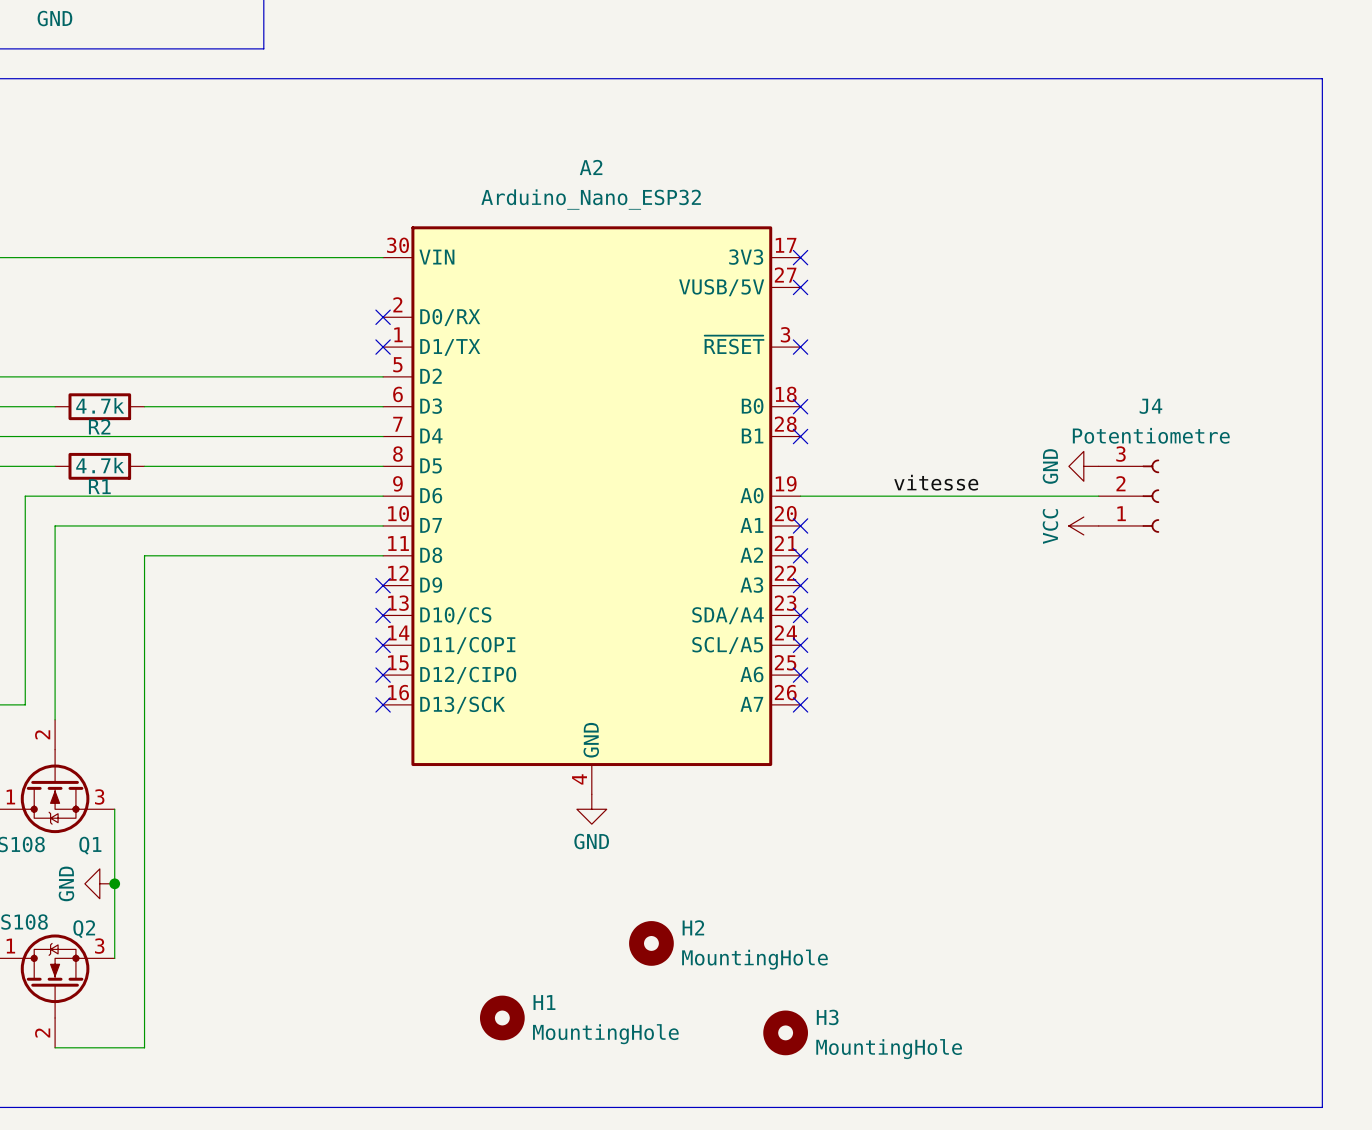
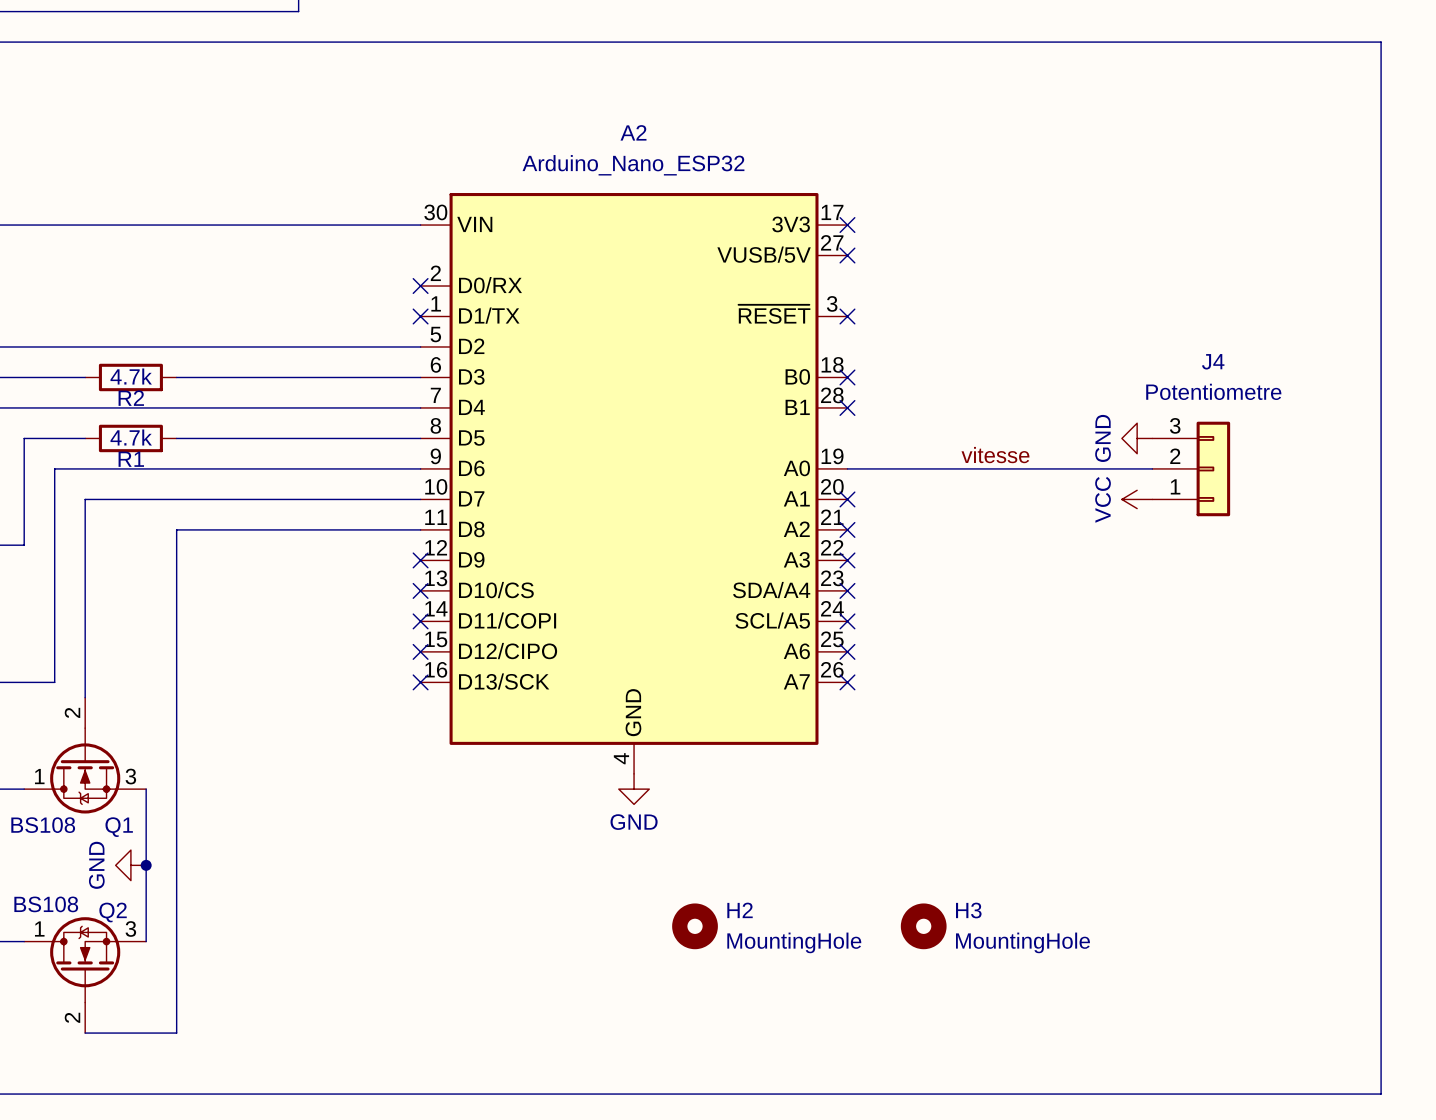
J4 symbol: [1098, 459, 1160, 533] -> [1152, 421, 1231, 517]
H1: MountingHole (502, 1017) -> none
H3 position: (785, 1032) -> (923, 926)

